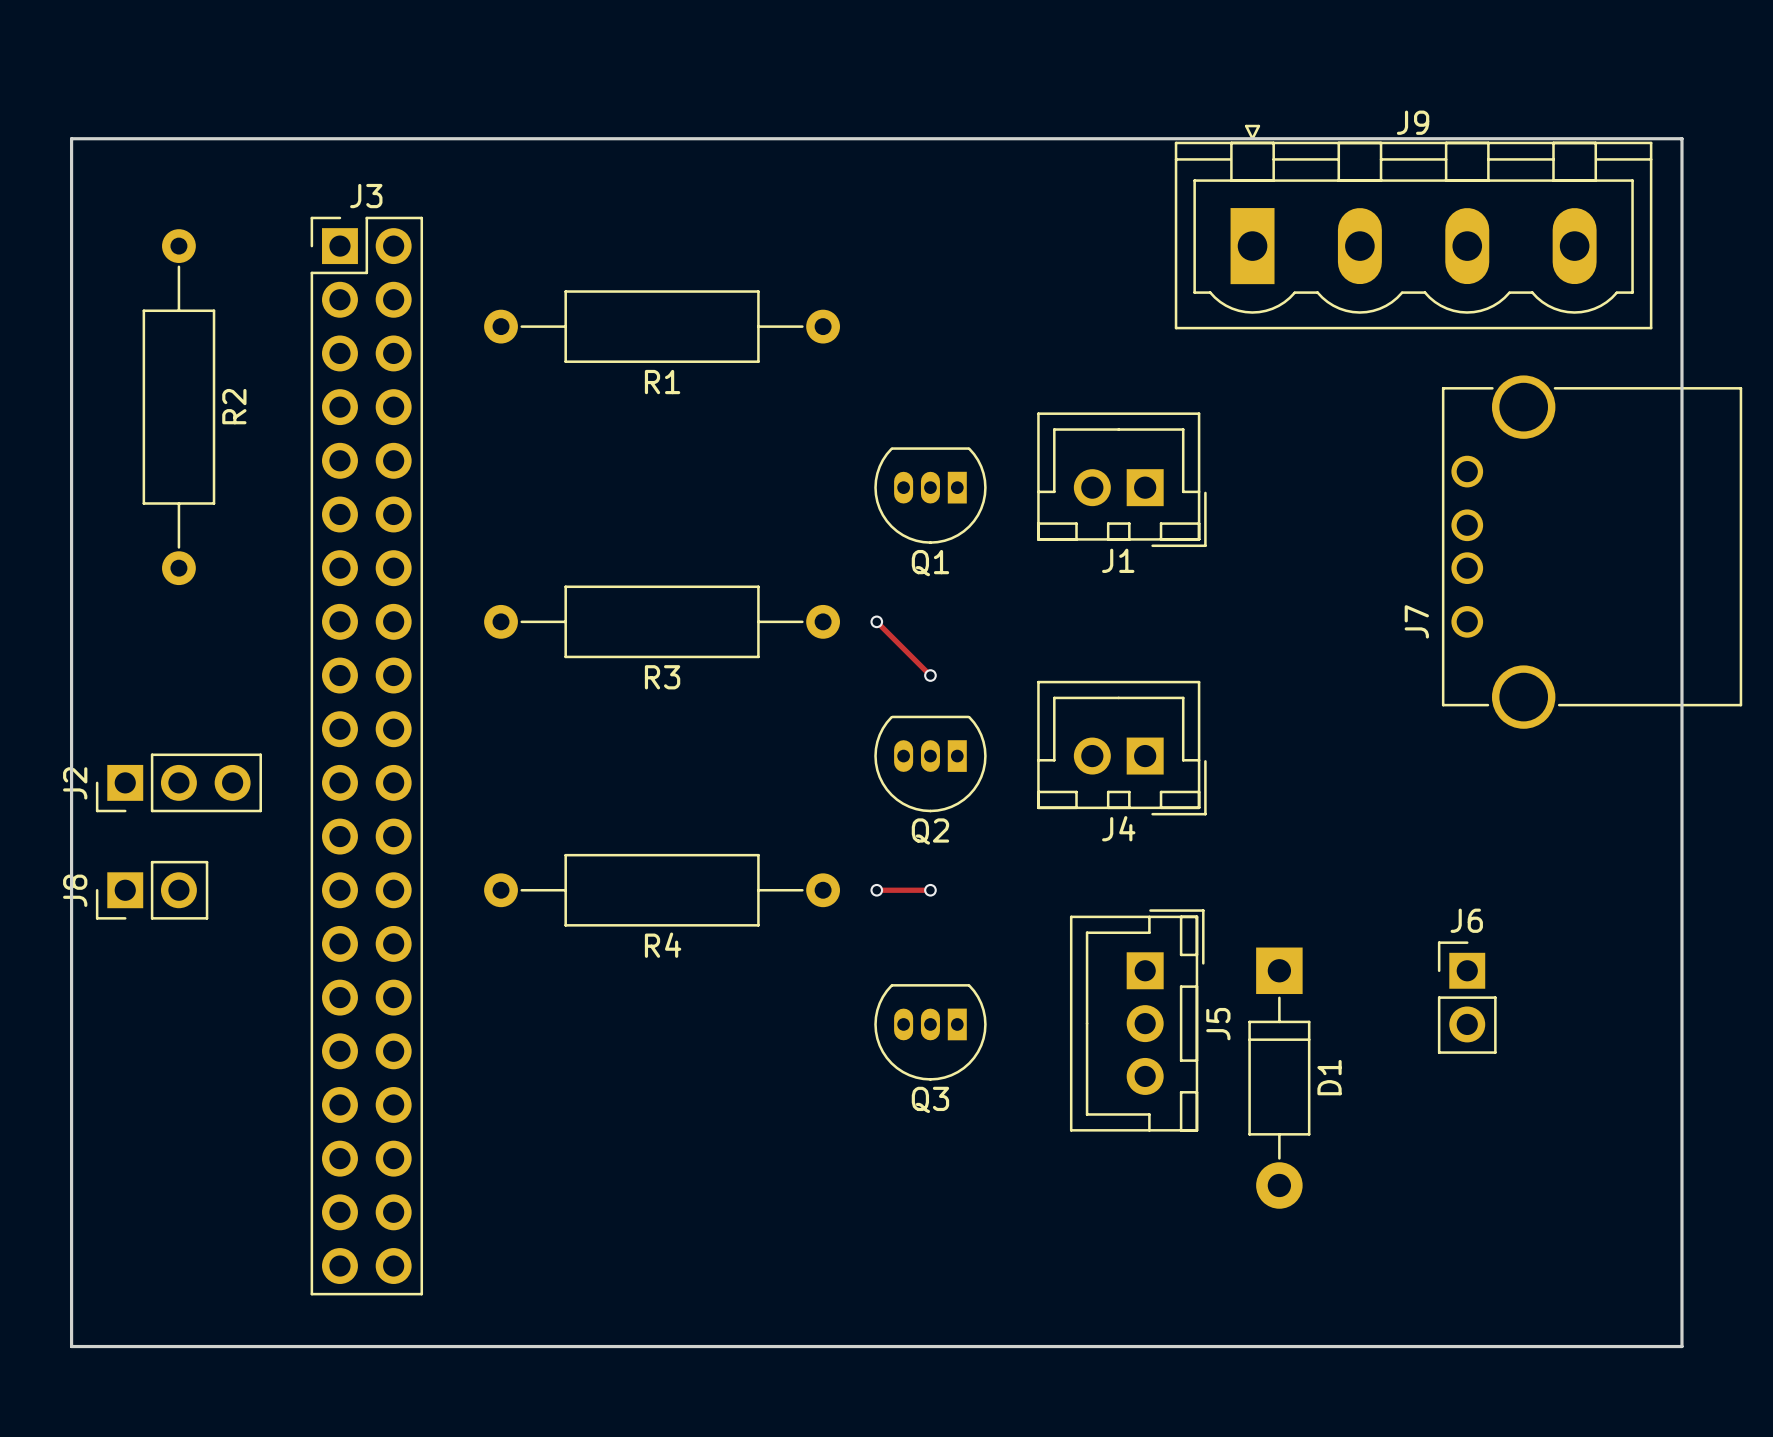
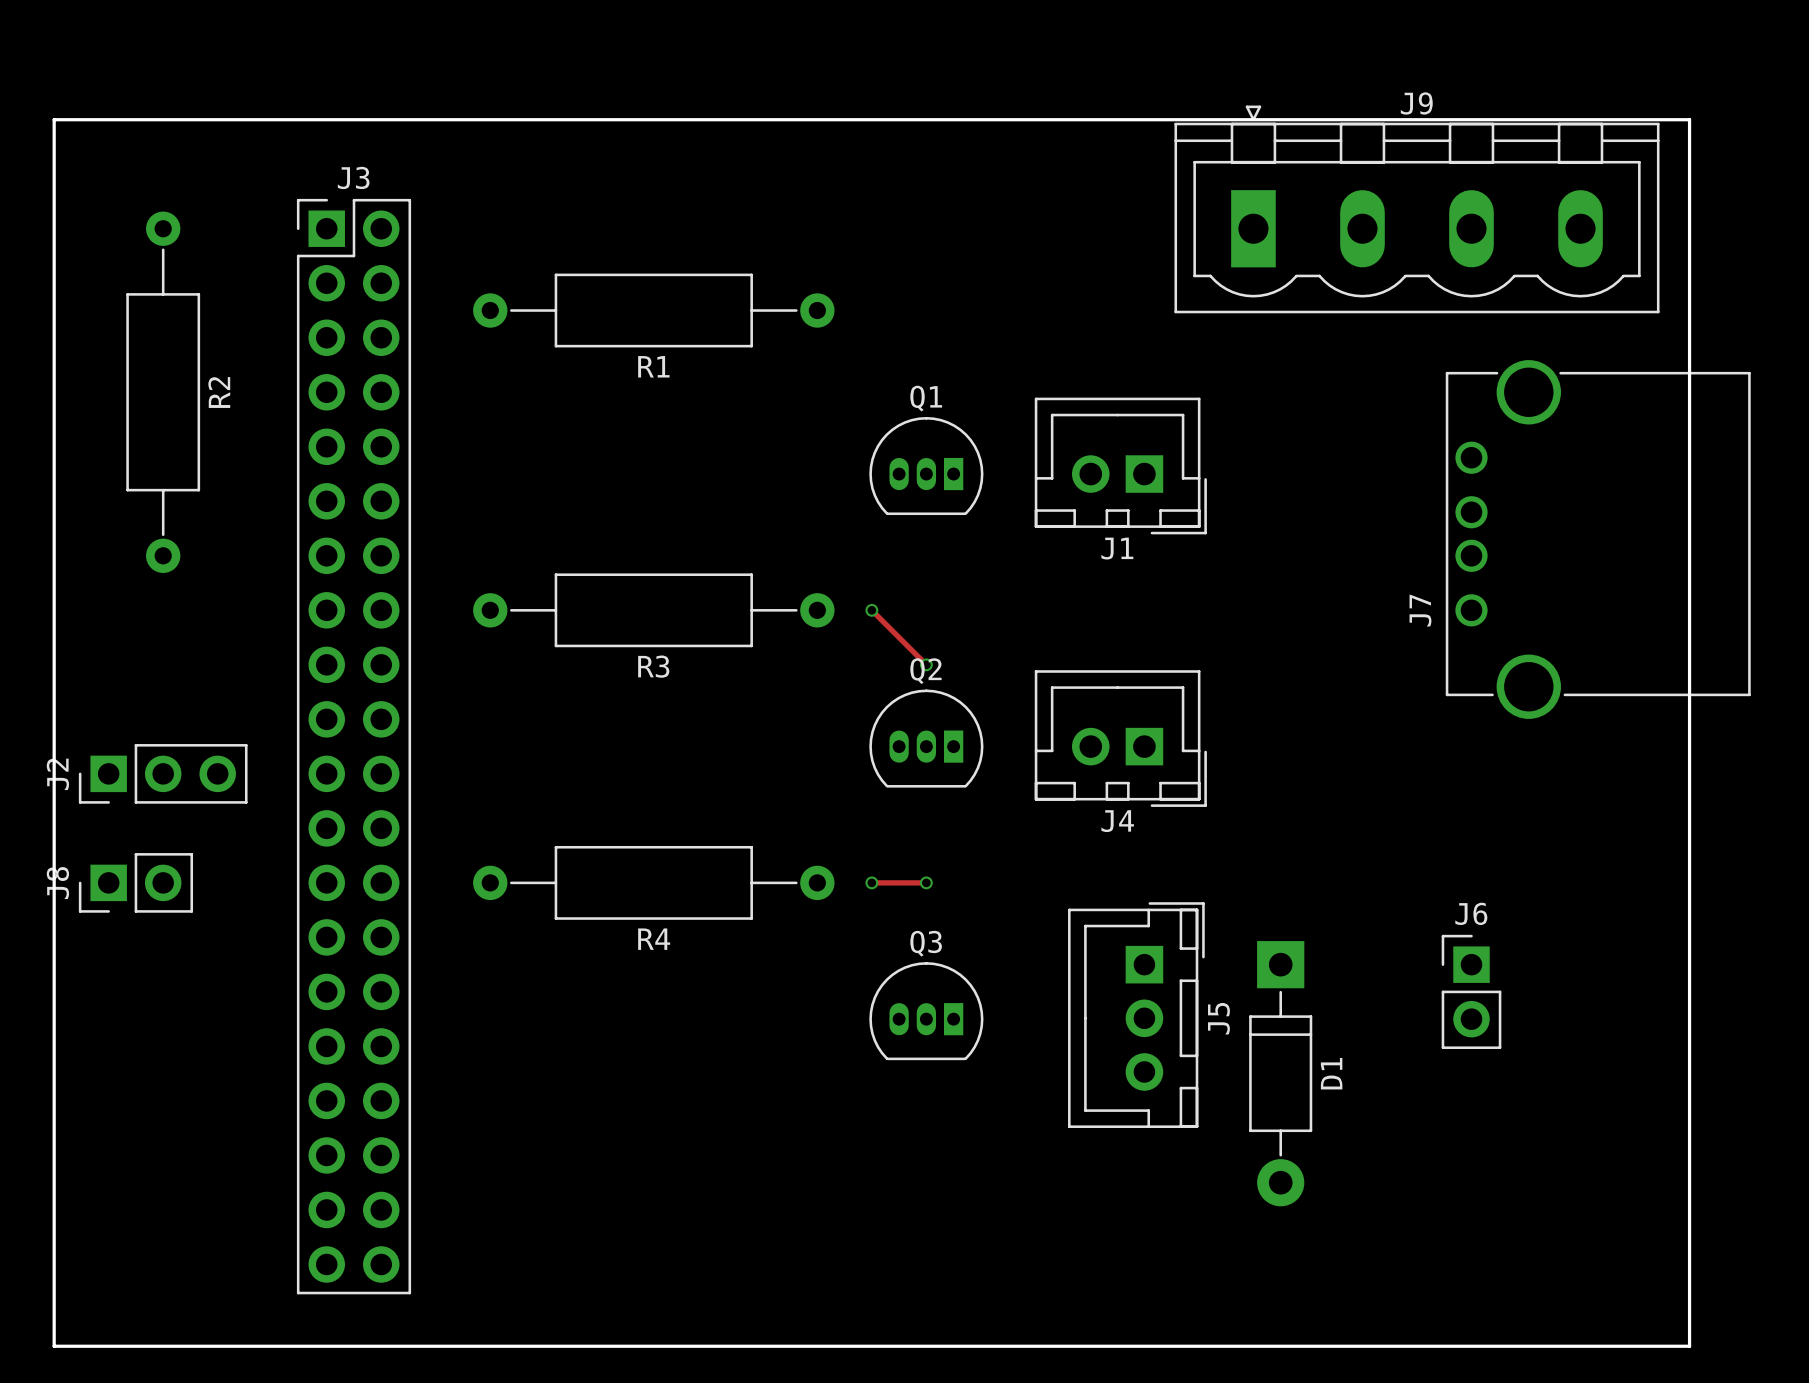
Q1 footprint: [874, 447, 987, 544] -> [869, 416, 984, 516]
Q1 name position: Q1 (930, 563) -> Q1 (926, 398)
Q2 footprint: [874, 715, 987, 813] -> [869, 689, 984, 788]
Q2 name position: Q2 (930, 831) -> Q2 (925, 671)
Q3 footprint: [874, 984, 987, 1081] -> [869, 962, 984, 1061]
Q3 name position: Q3 (930, 1099) -> Q3 (926, 943)

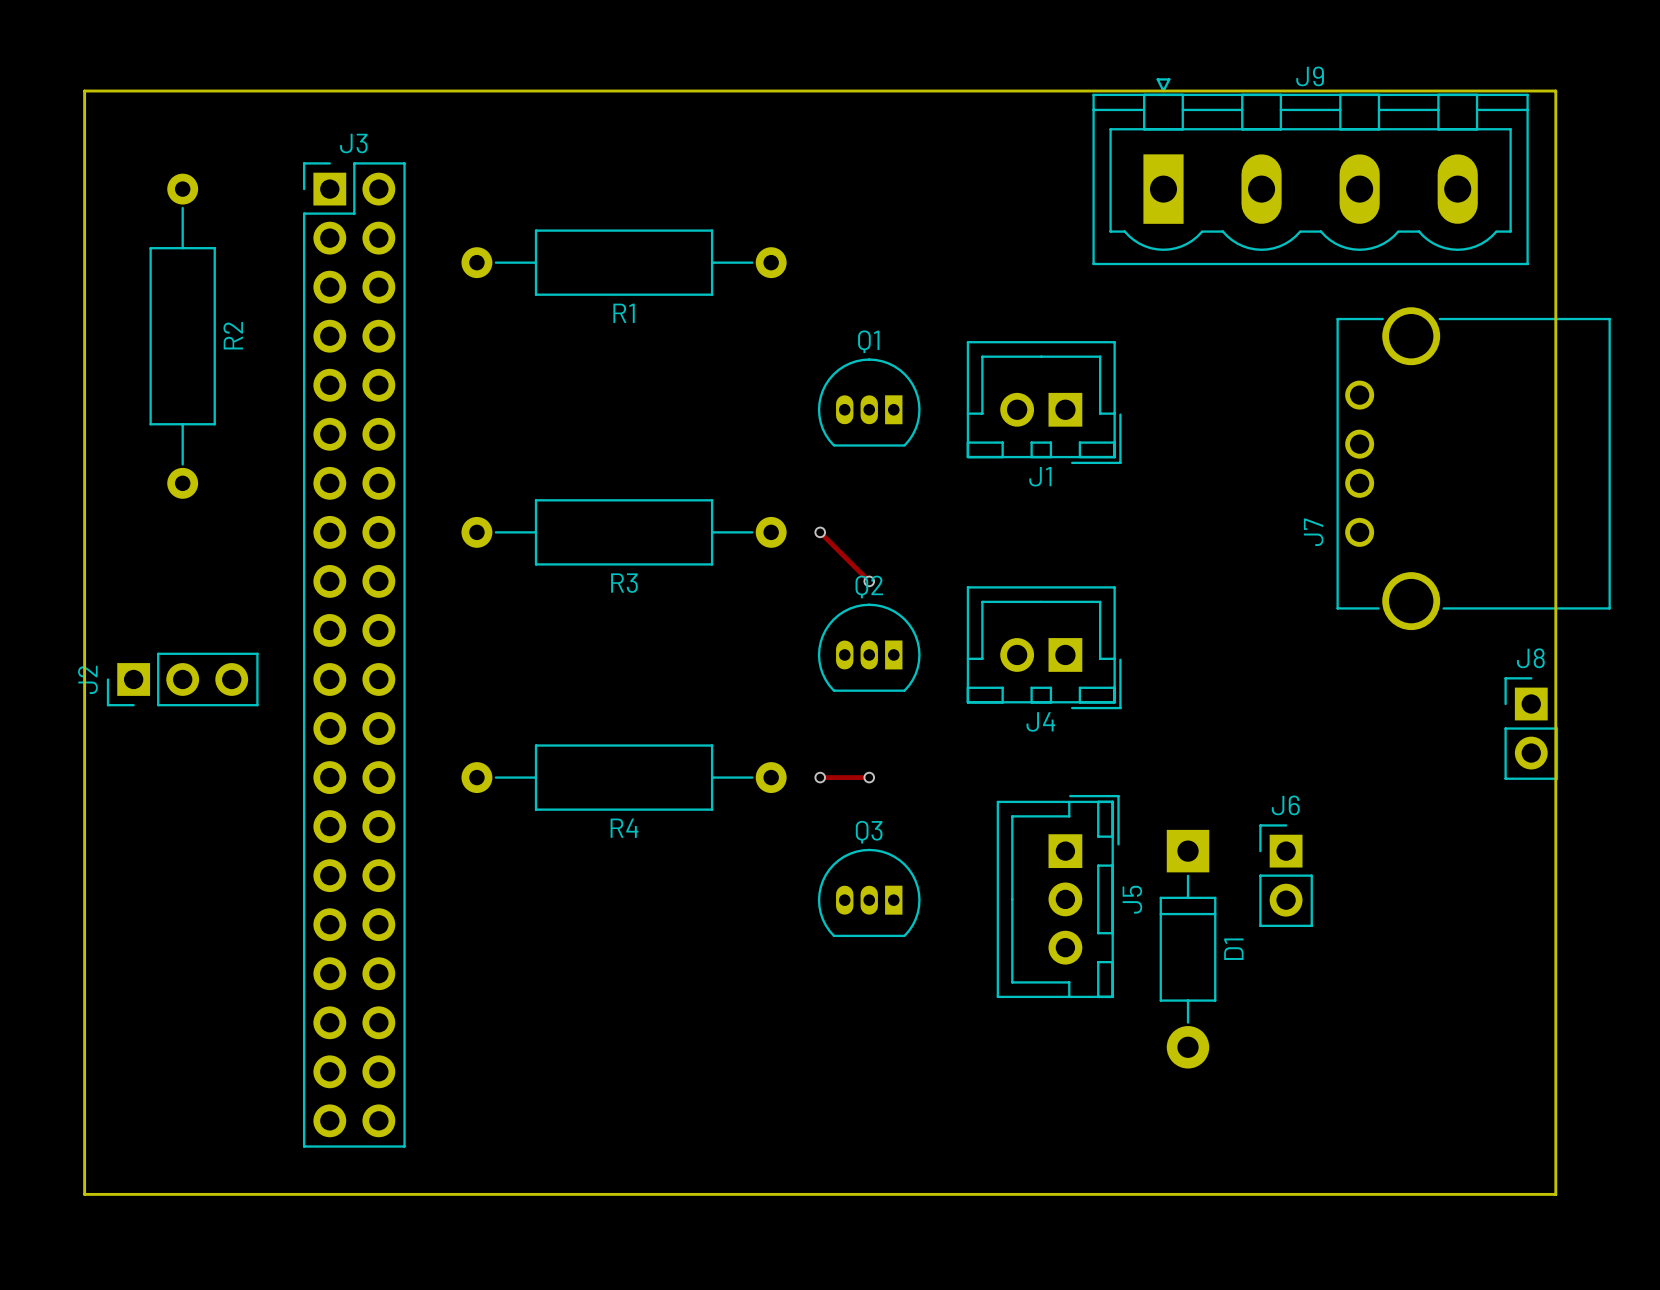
J8 rotation: 0° (135, 882) -> 90° clockwise (1531, 728)
J8 position: (135, 882) -> (1531, 728)
J6 position: (1471, 991) -> (1286, 875)

